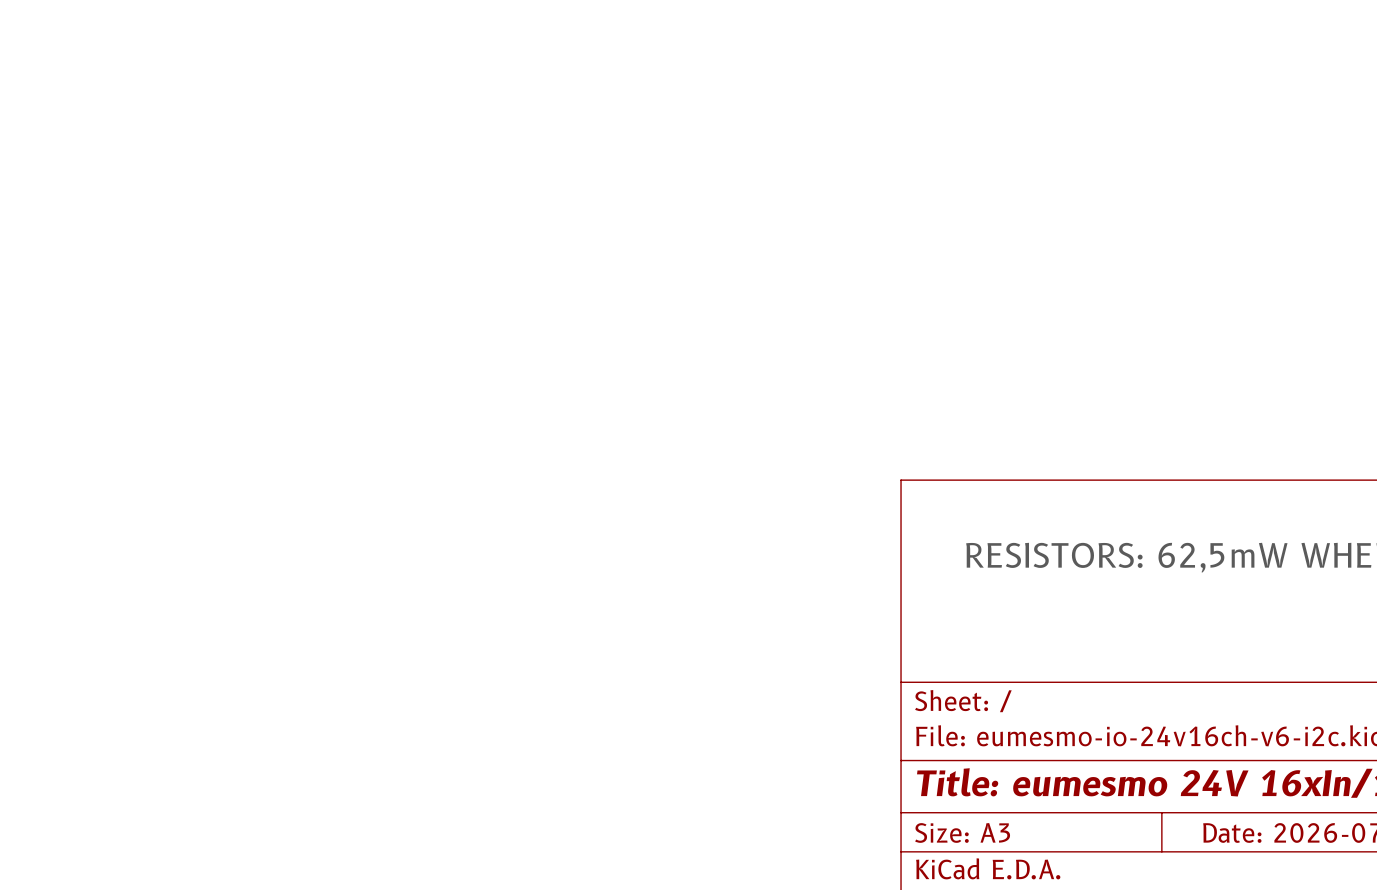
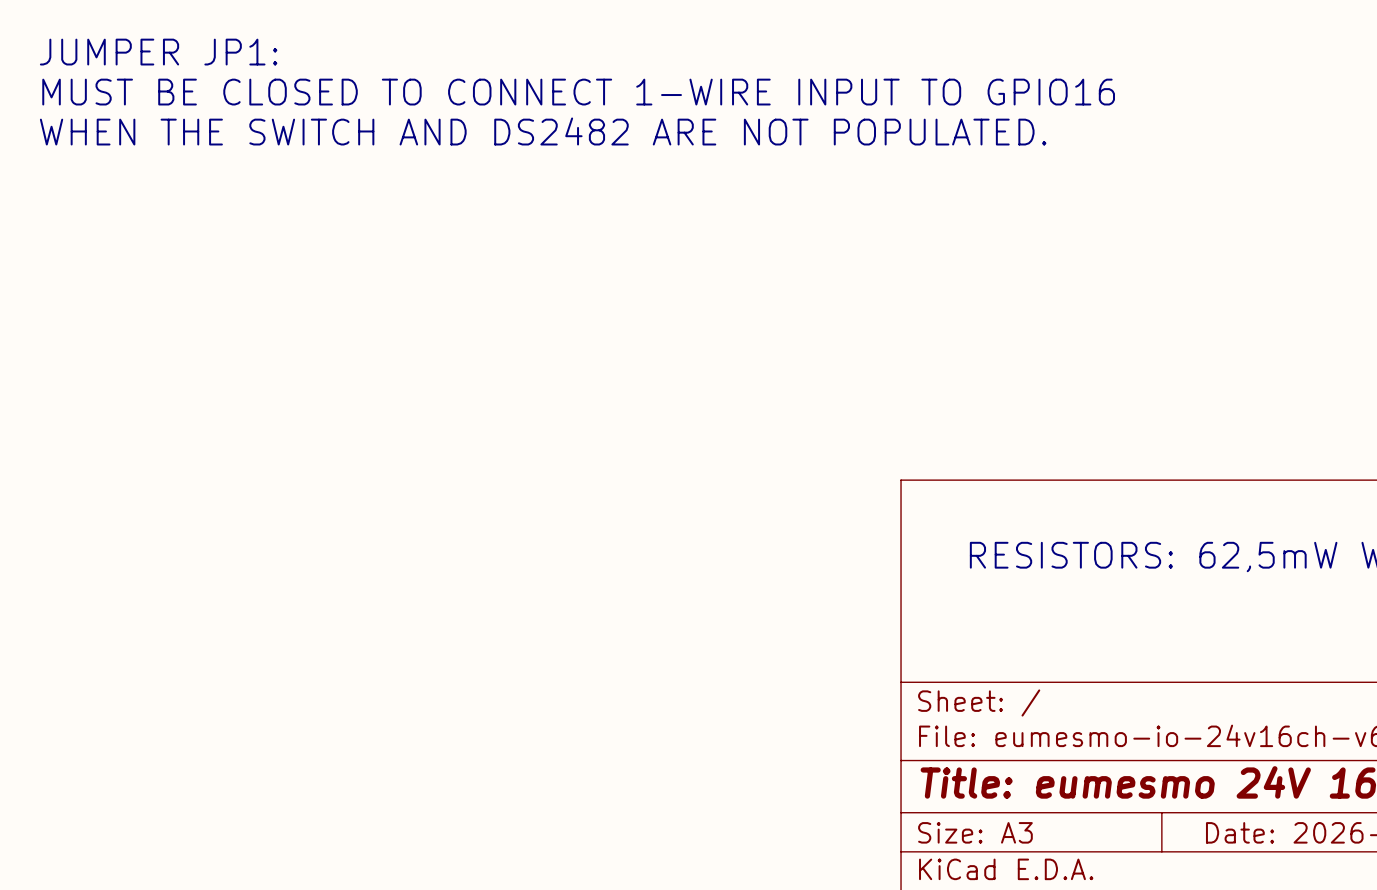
text: none -> JUMPER JP1: (158, 52)
text: none -> MUST BE CLOSED TO CONNECT 1-WIRE INPUT TO GPIO16 (578, 92)
text: none -> WHEN THE SWITCH AND DS2482 ARE NOT POPULATED. (543, 131)

